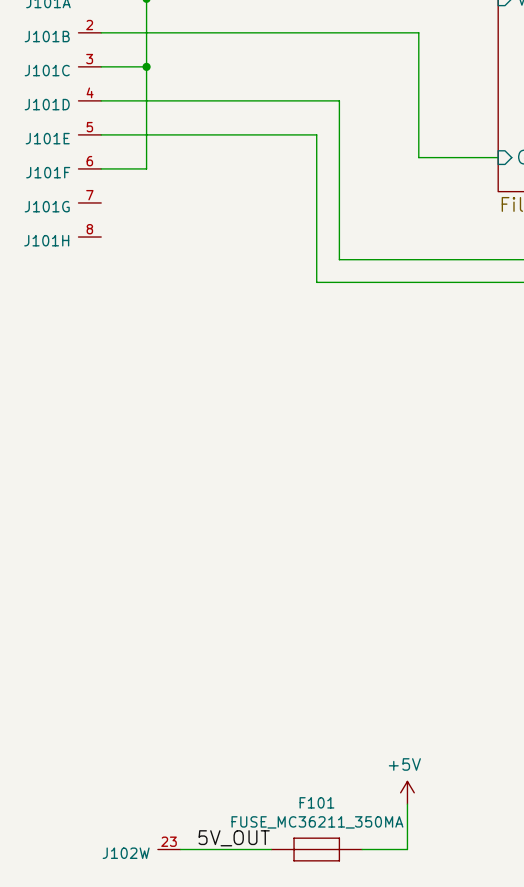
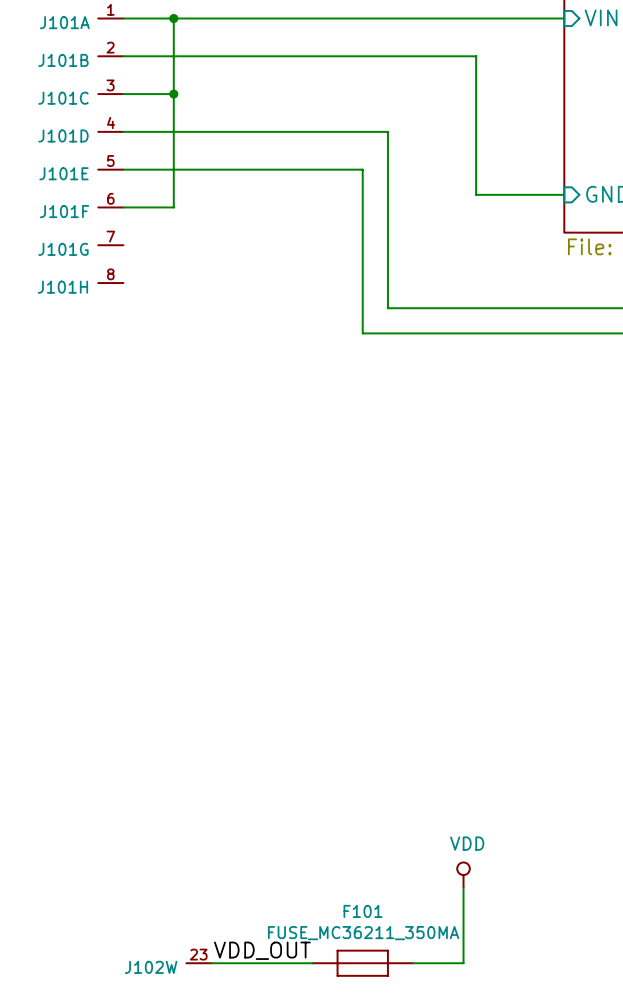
power symbol: none -> VDD (463, 875)
power symbol: +5V (407, 792) -> none
label: 5V_OUT (234, 838) -> VDD_OUT (262, 950)

